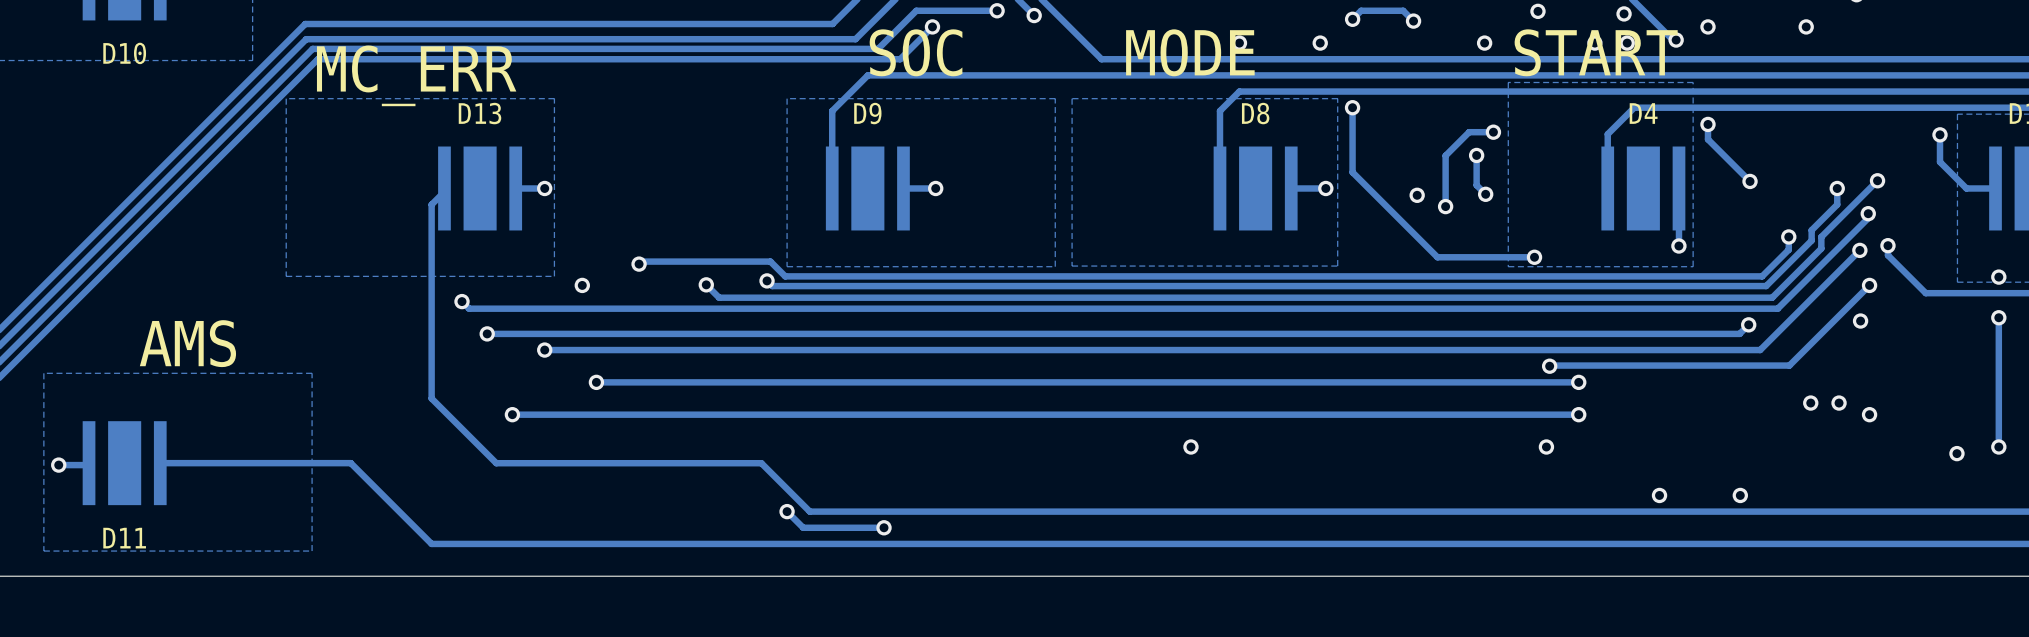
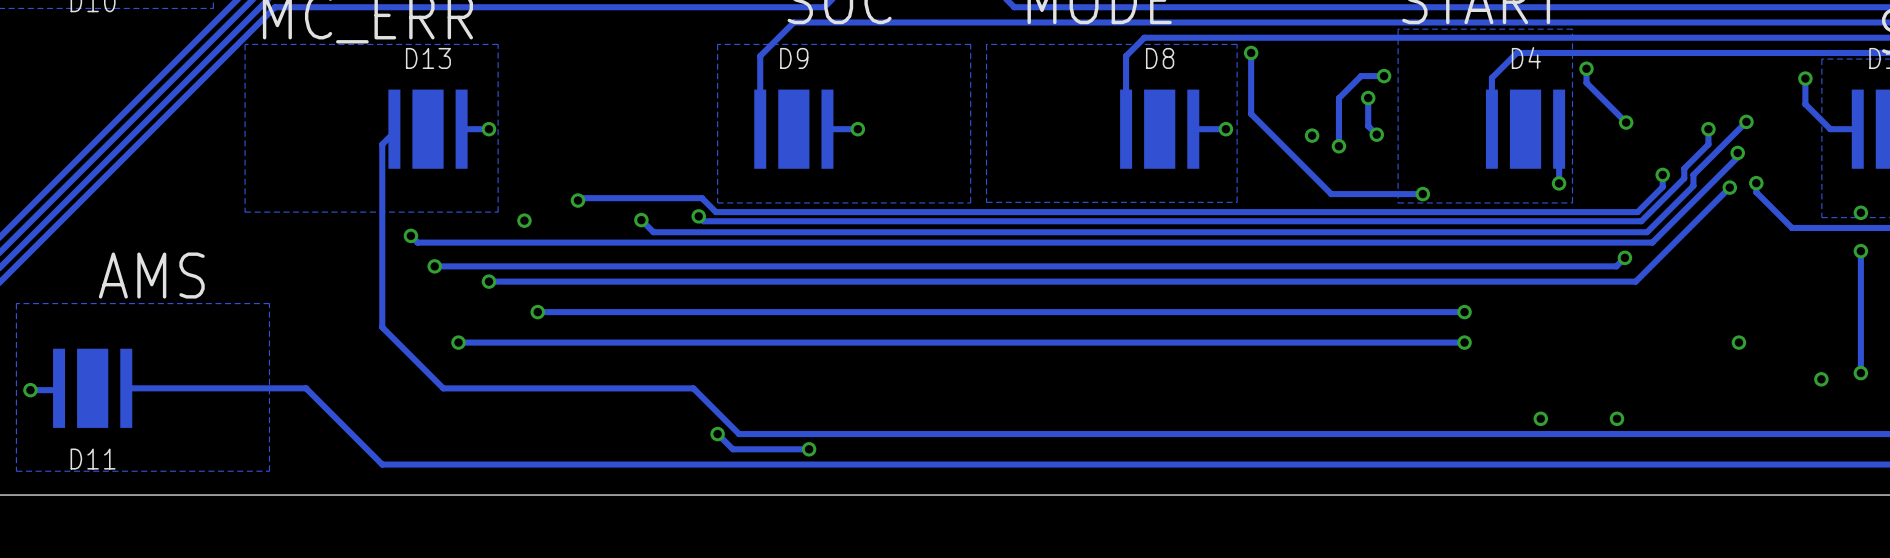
track: (1869, 285) (1789, 365) (1549, 366) -> none
via: (1869, 285) -> none
via: (1860, 321) -> none
via: (1549, 366) -> none
via: (1810, 403) -> none
via: (1839, 403) -> none
via: (1190, 446) -> none
via: (1546, 446) -> none

